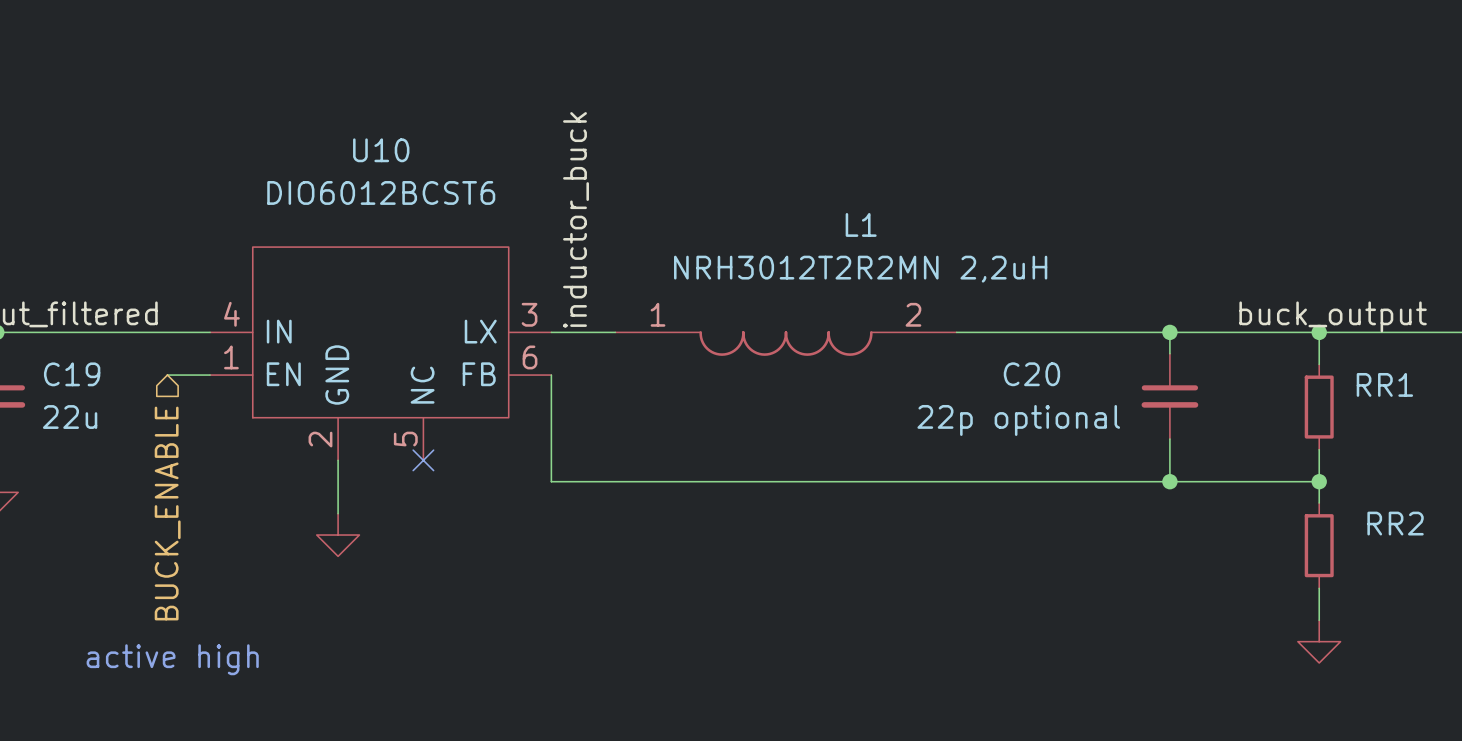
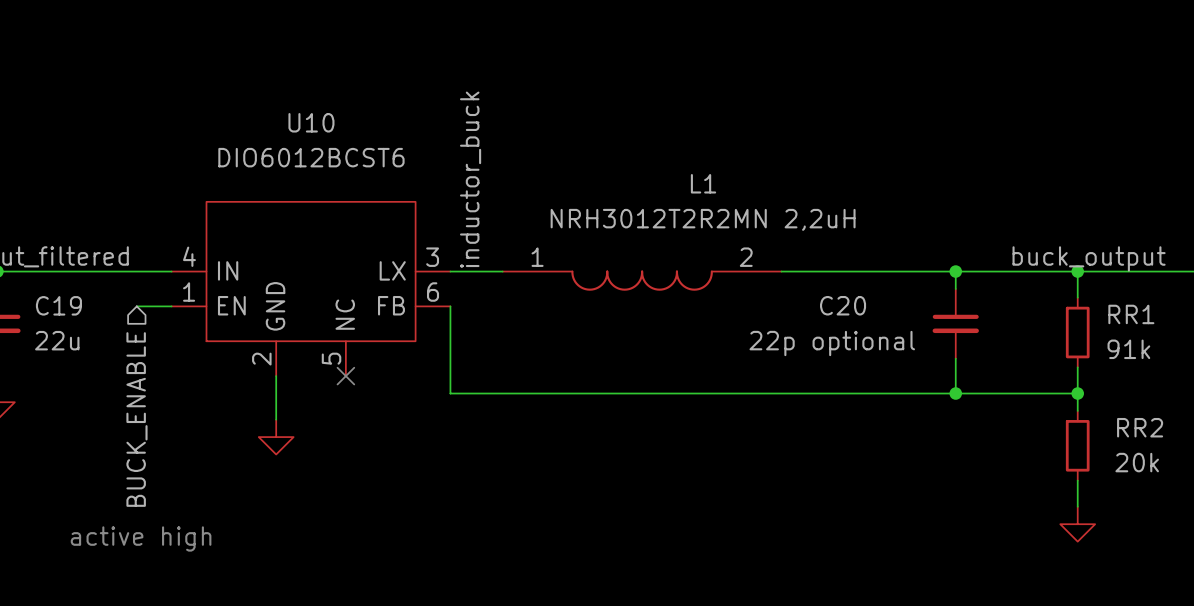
RR1 value: none -> 91k (1128, 349)
RR2 value: none -> 20k (1137, 462)

